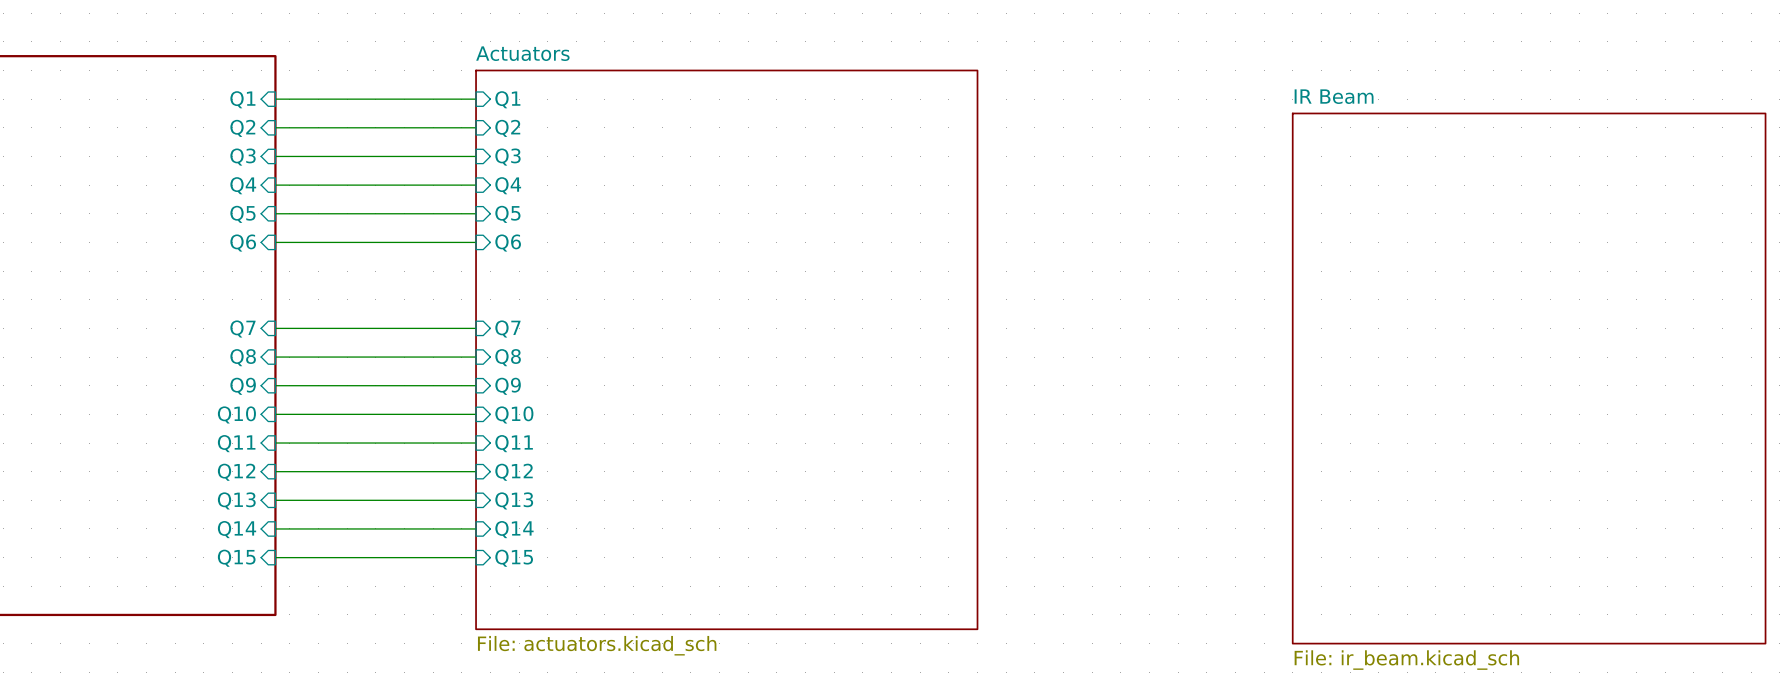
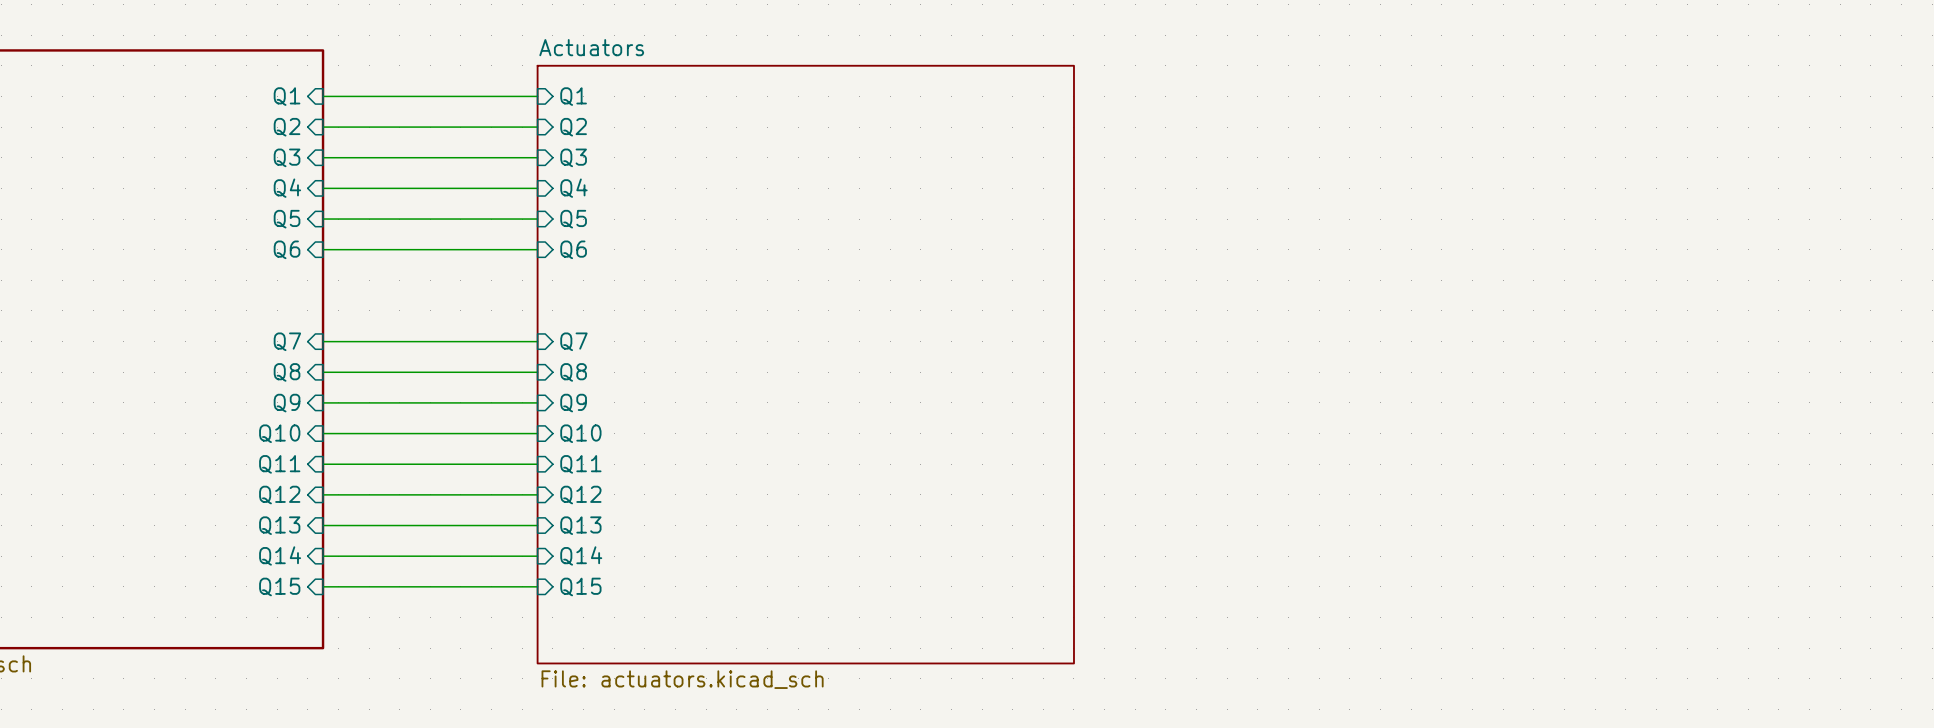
sheet IR Beam: File: ir_beam.kicad_sch (1529, 378) -> none

